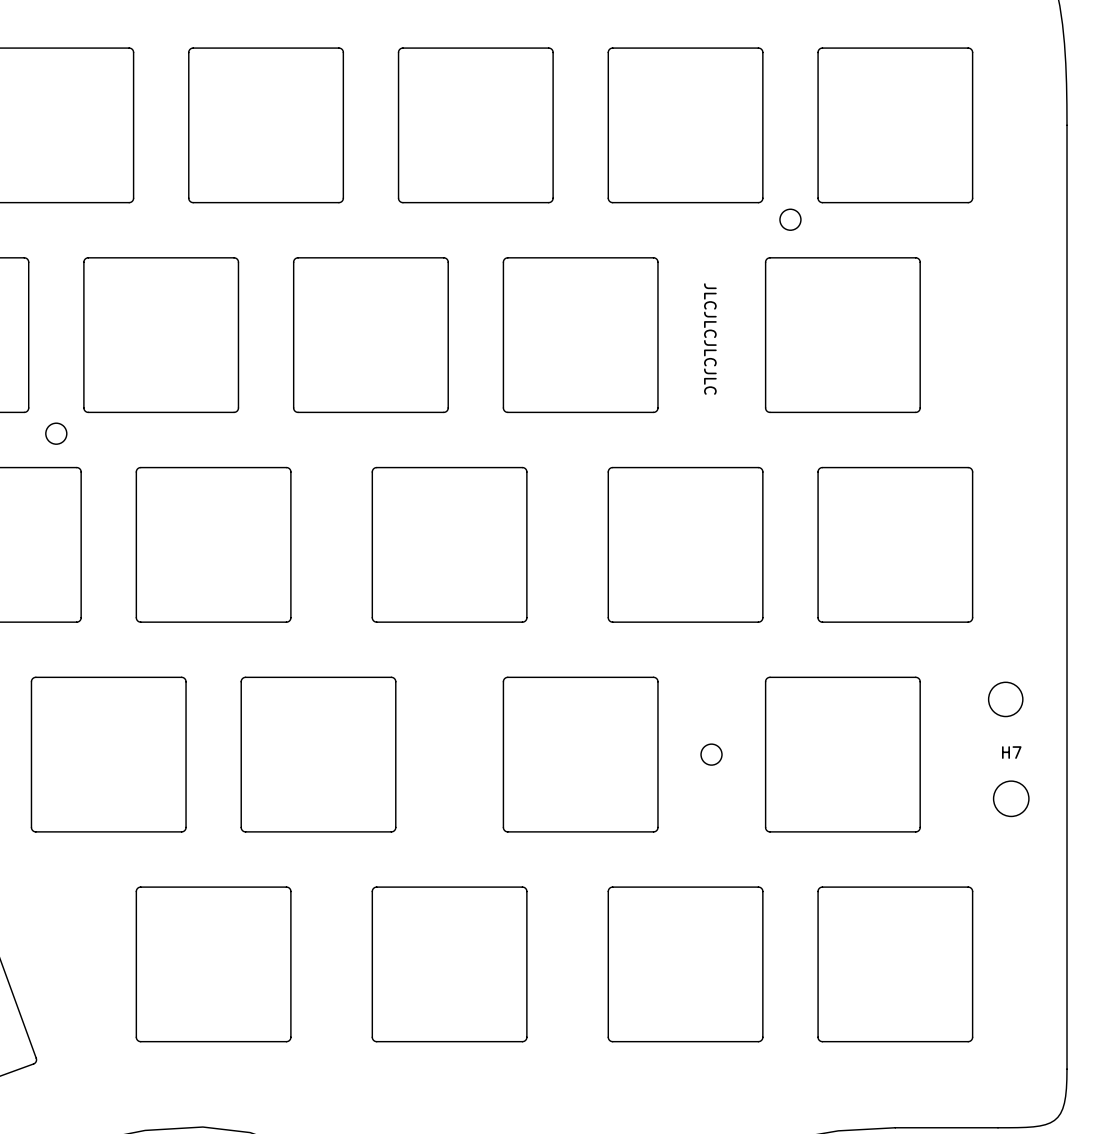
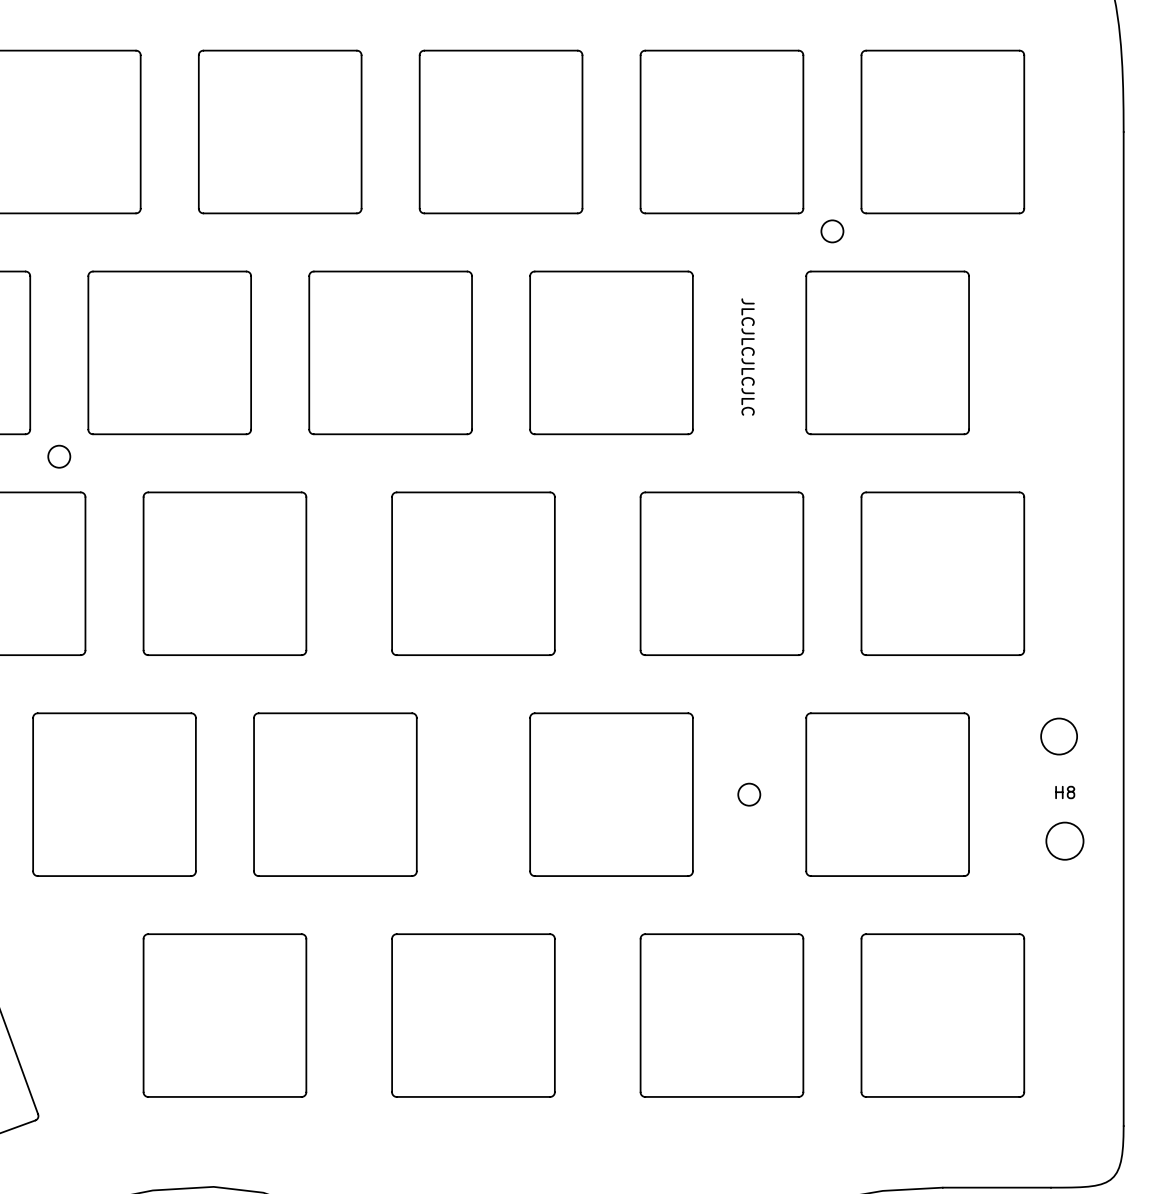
H7 name: H7 (1011, 752) -> H8 (1065, 792)

